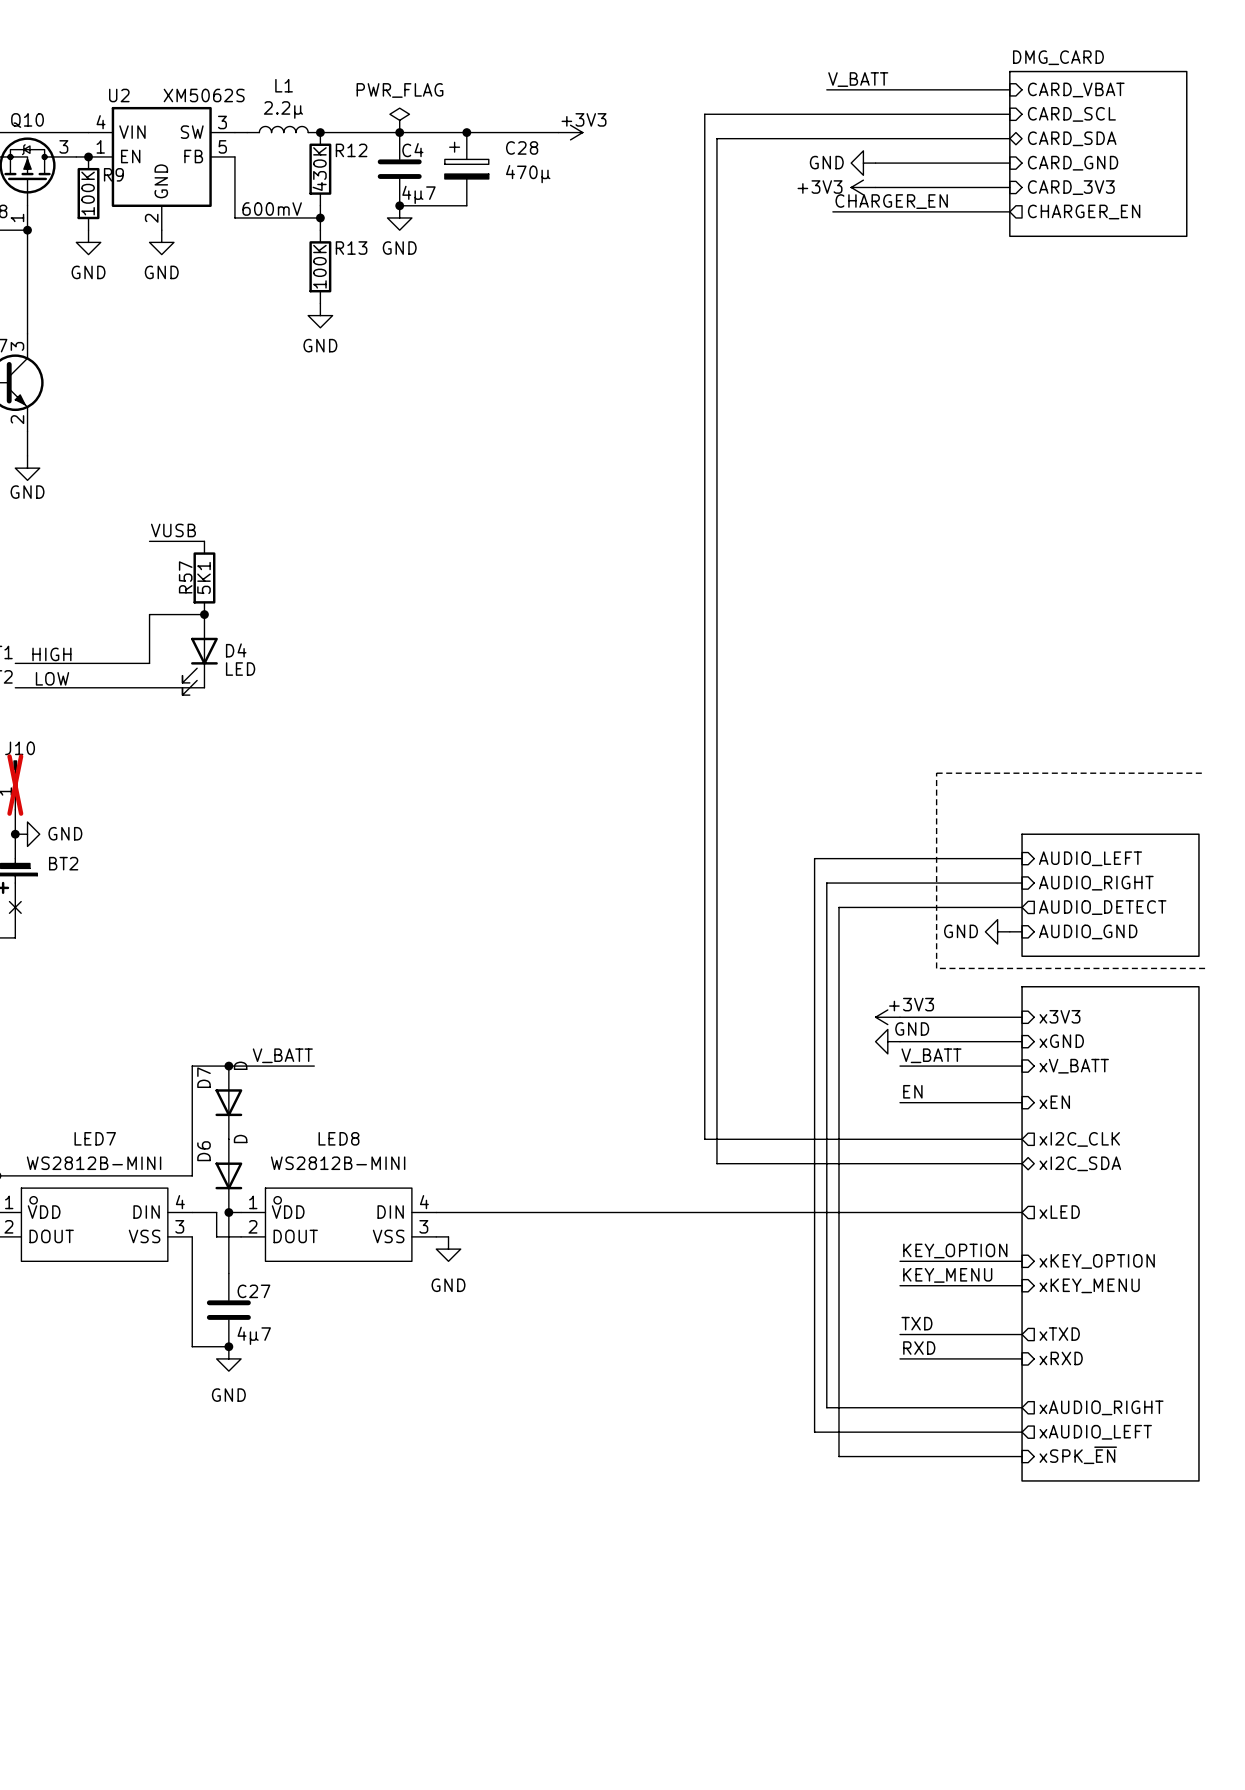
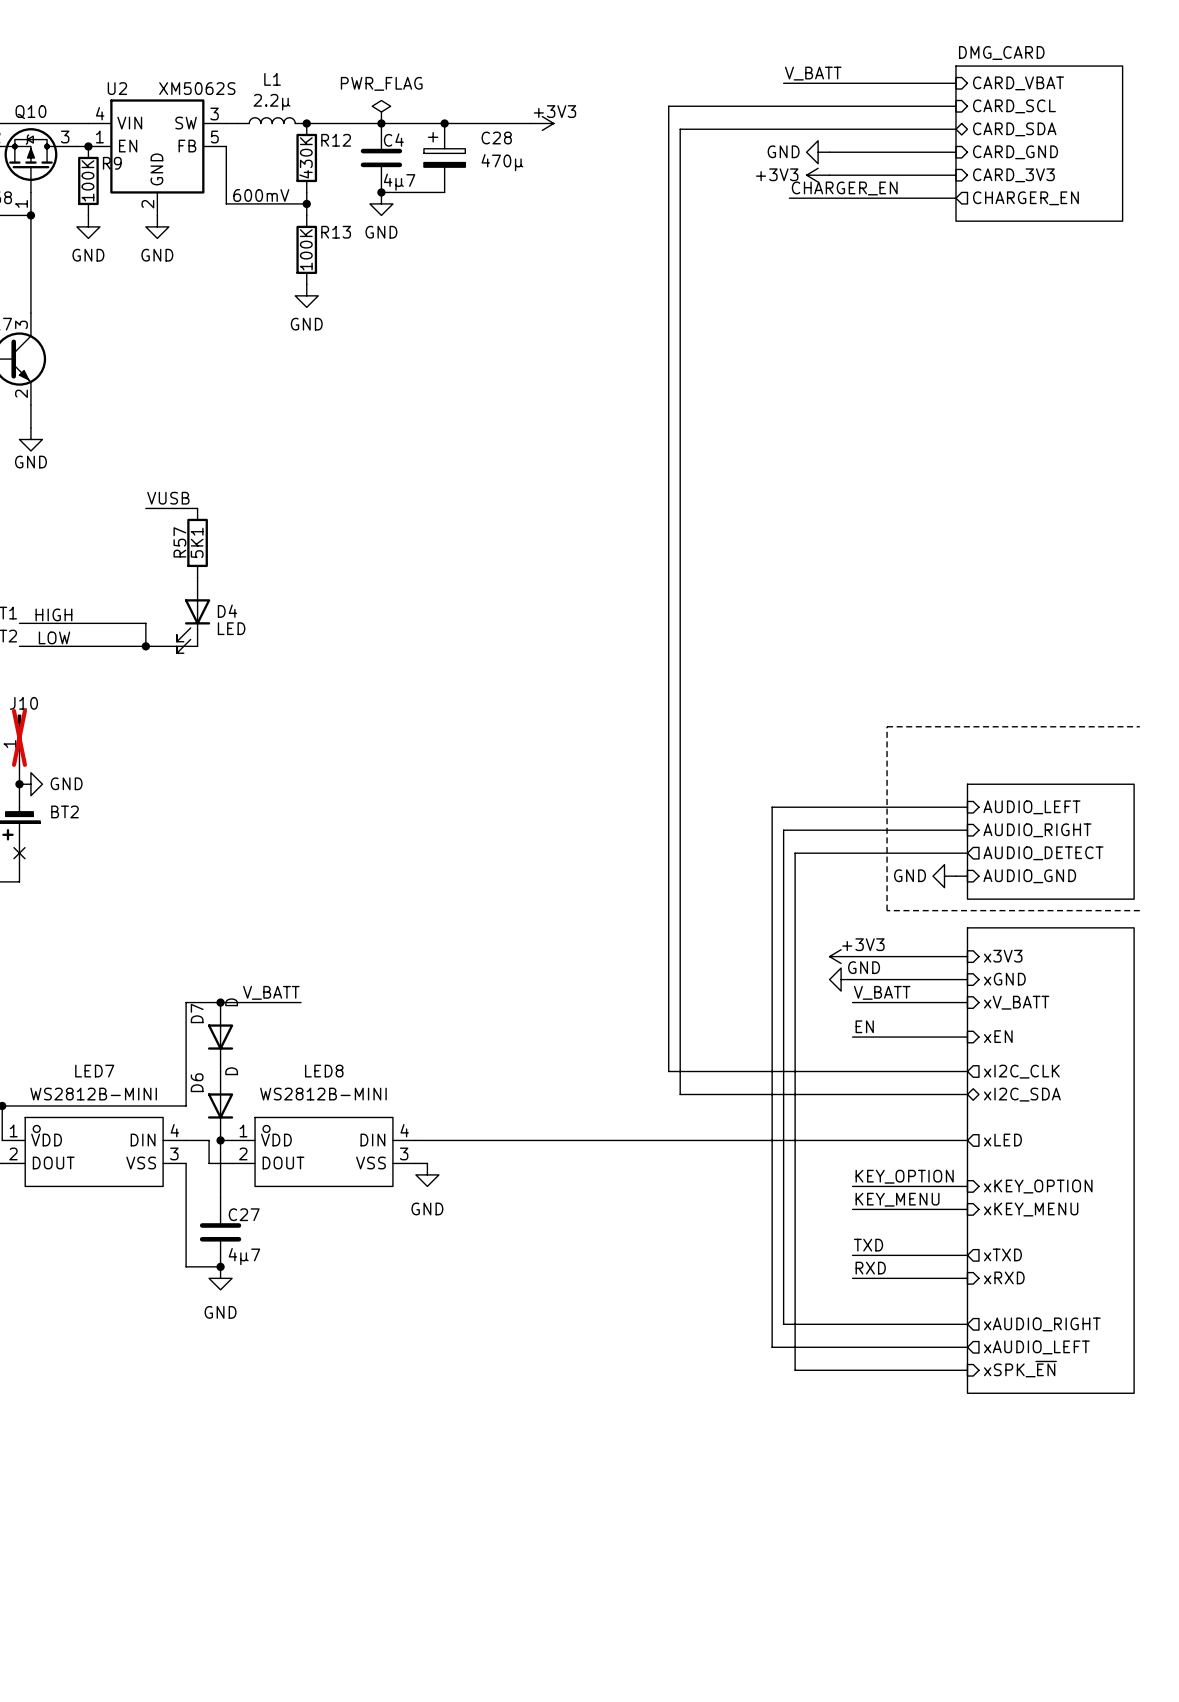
wire: (204, 614) (149, 614) (149, 663) -> (145, 646) (145, 623)
junction: (204, 614) -> none
junction: none -> (145, 646)

